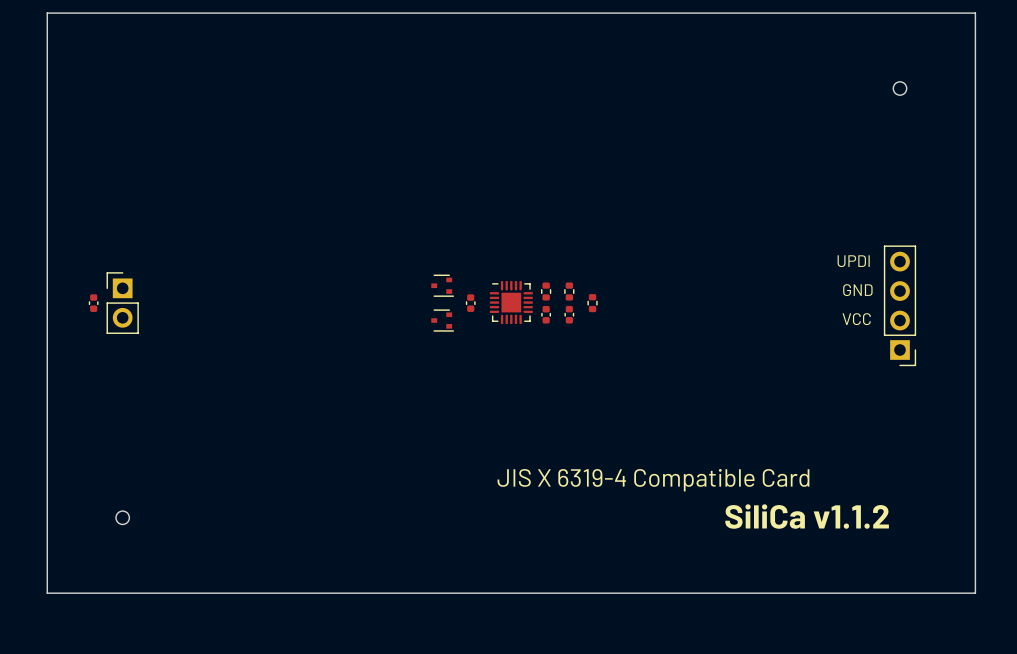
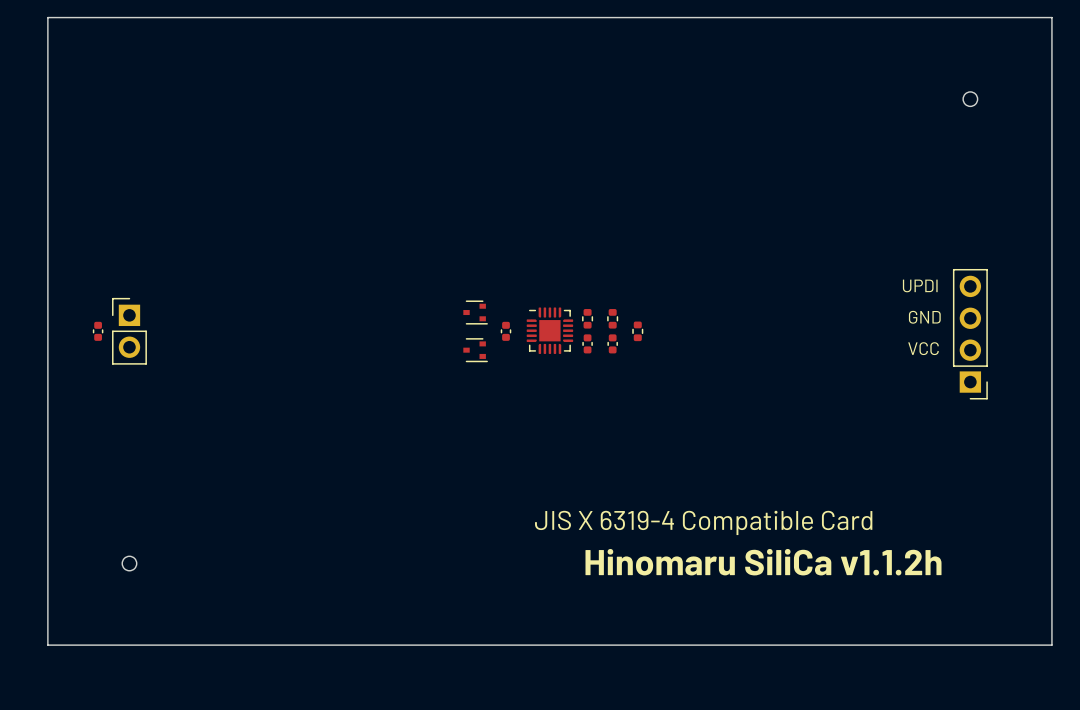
text: SiliCa v1.1.2 (807, 516) -> Hinomaru SiliCa v1.1.2h (763, 562)

